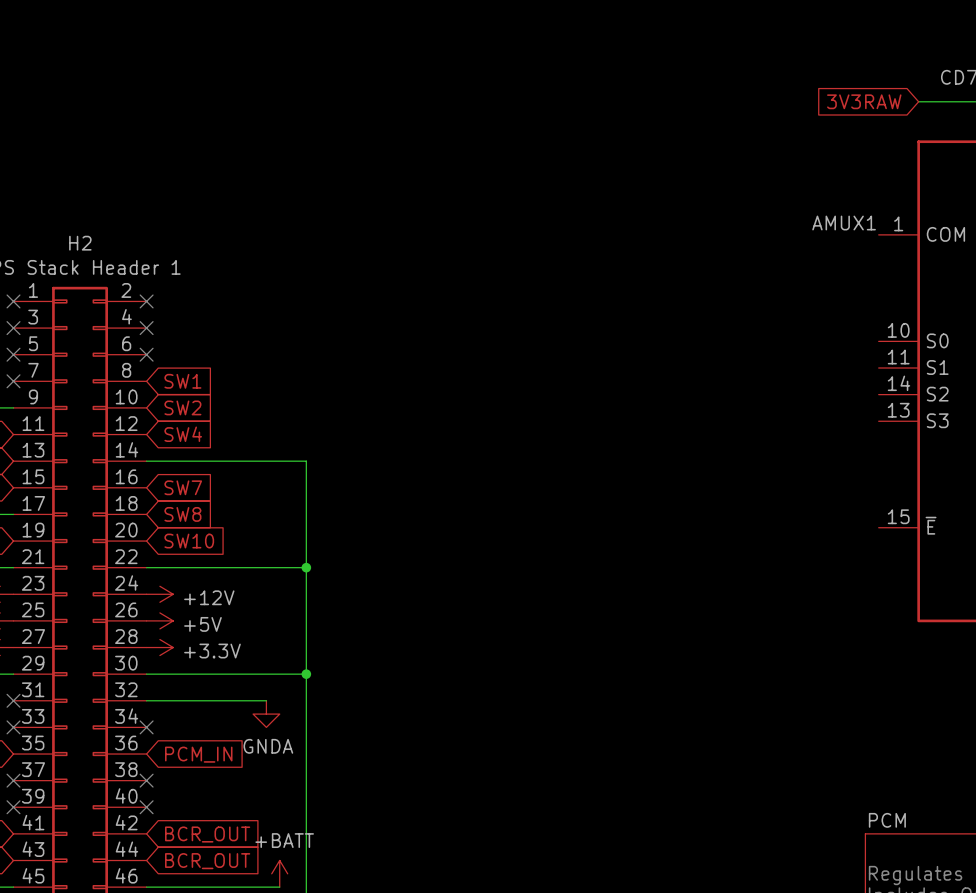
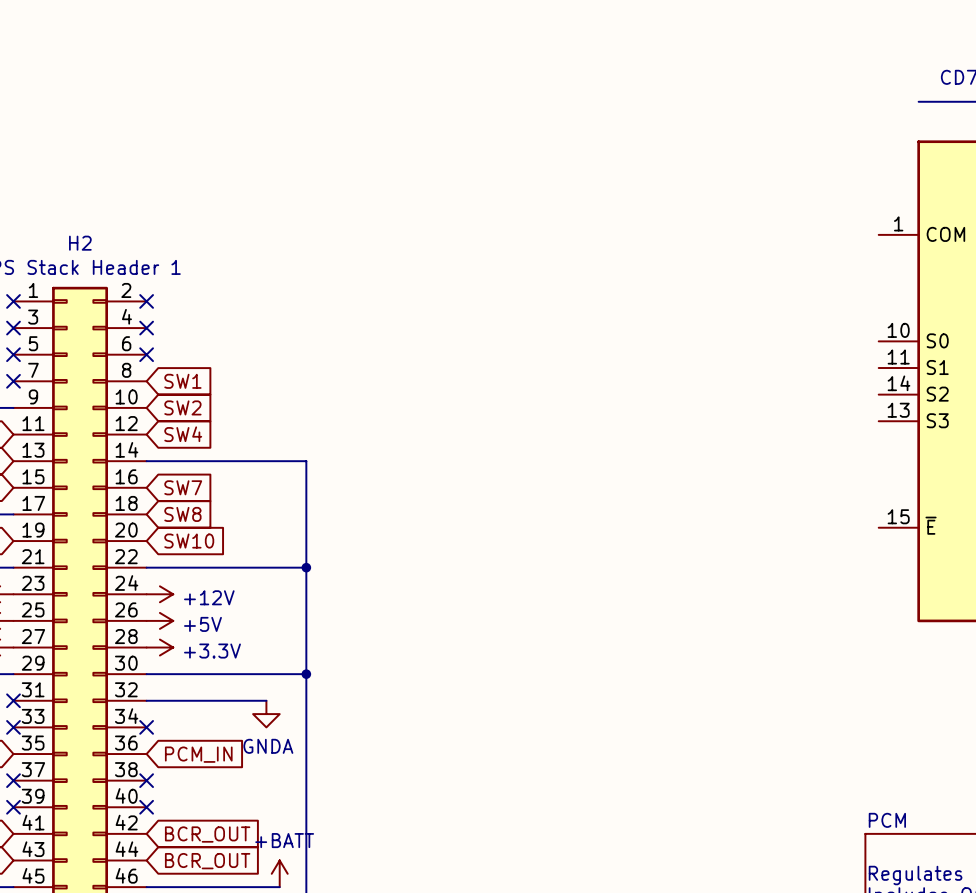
global label: 3V3RAW (864, 101) -> none
label: AMUX1 (844, 223) -> none

